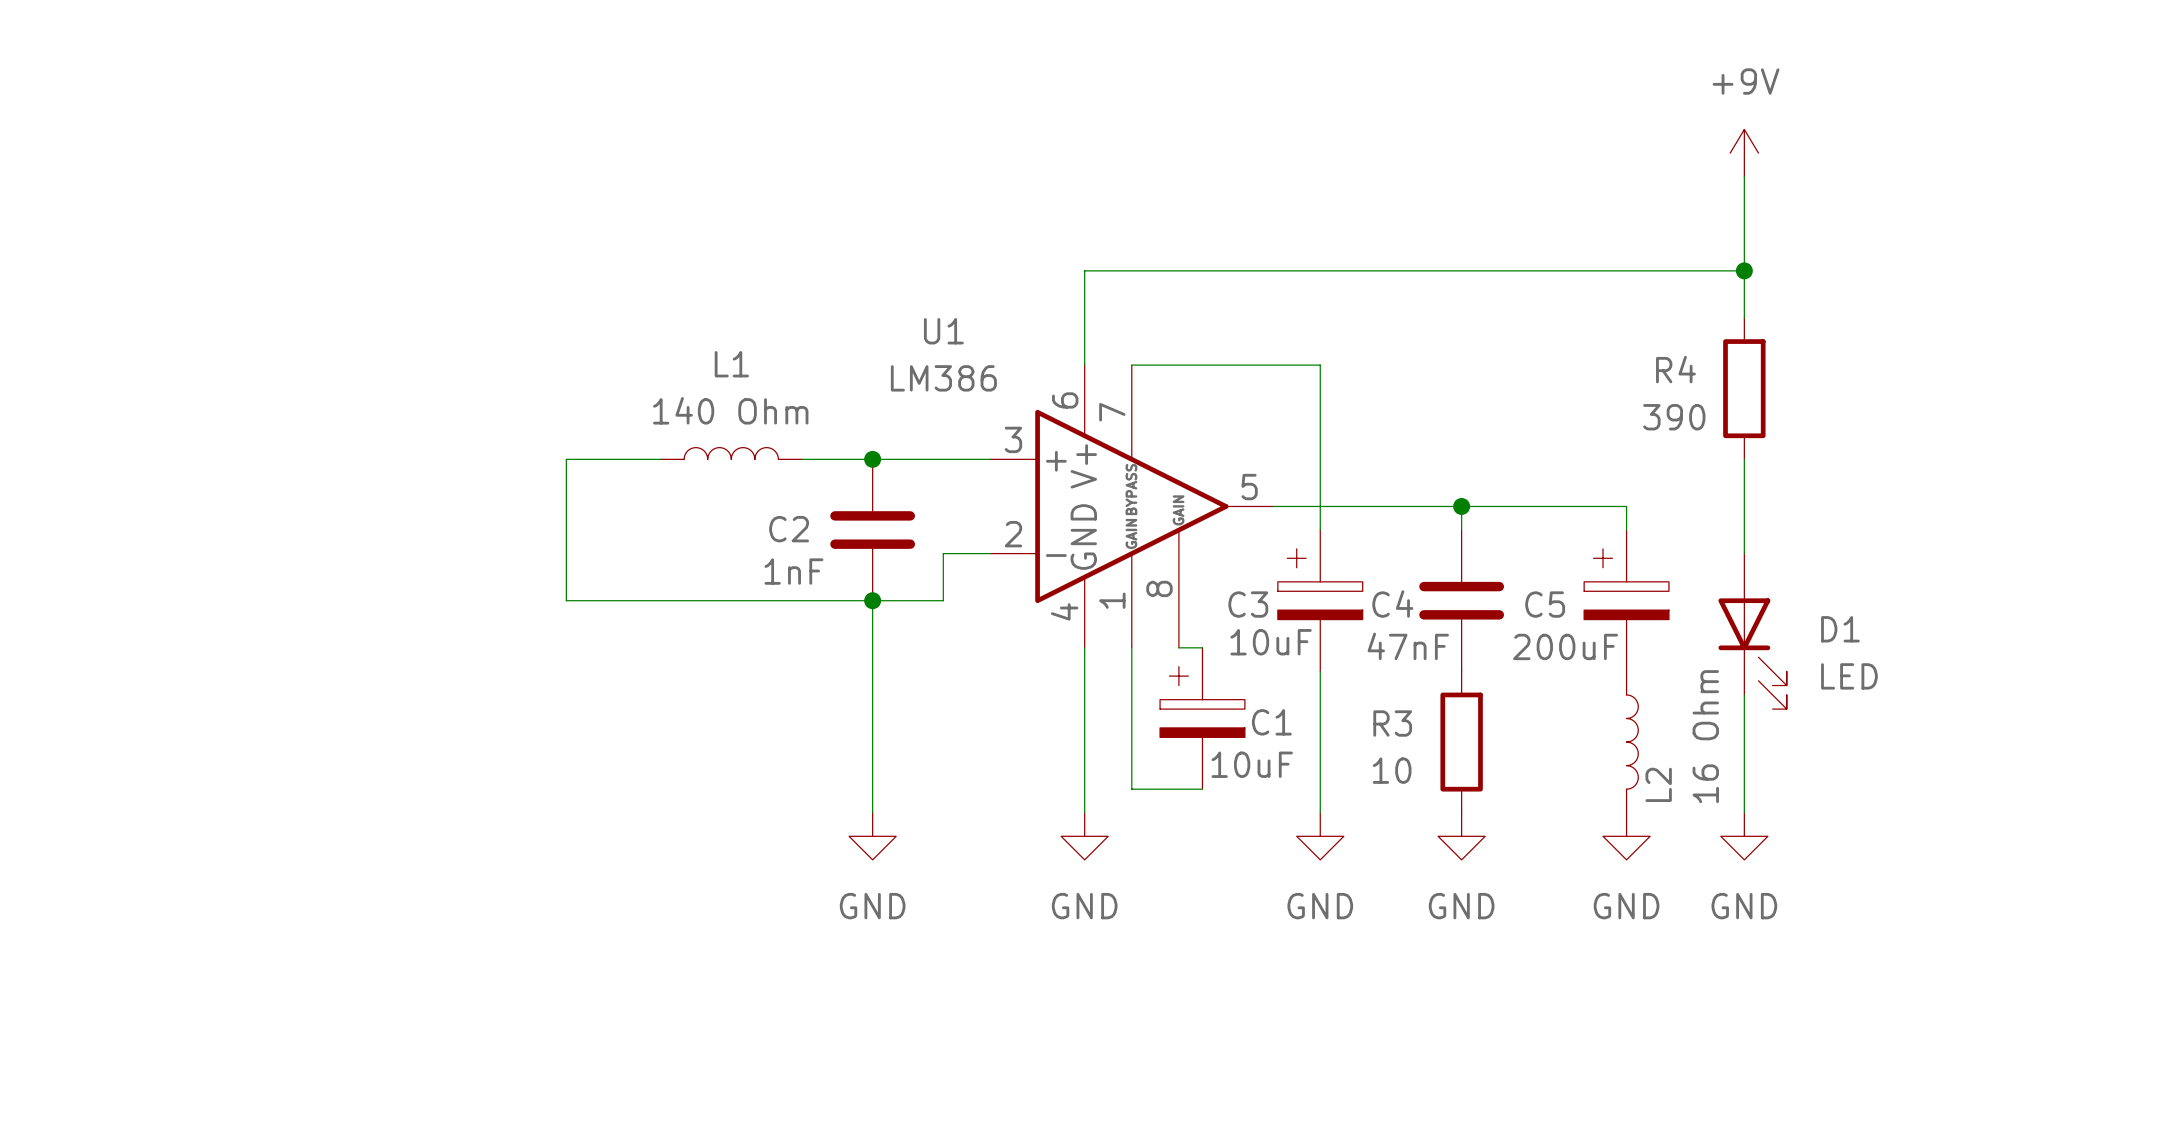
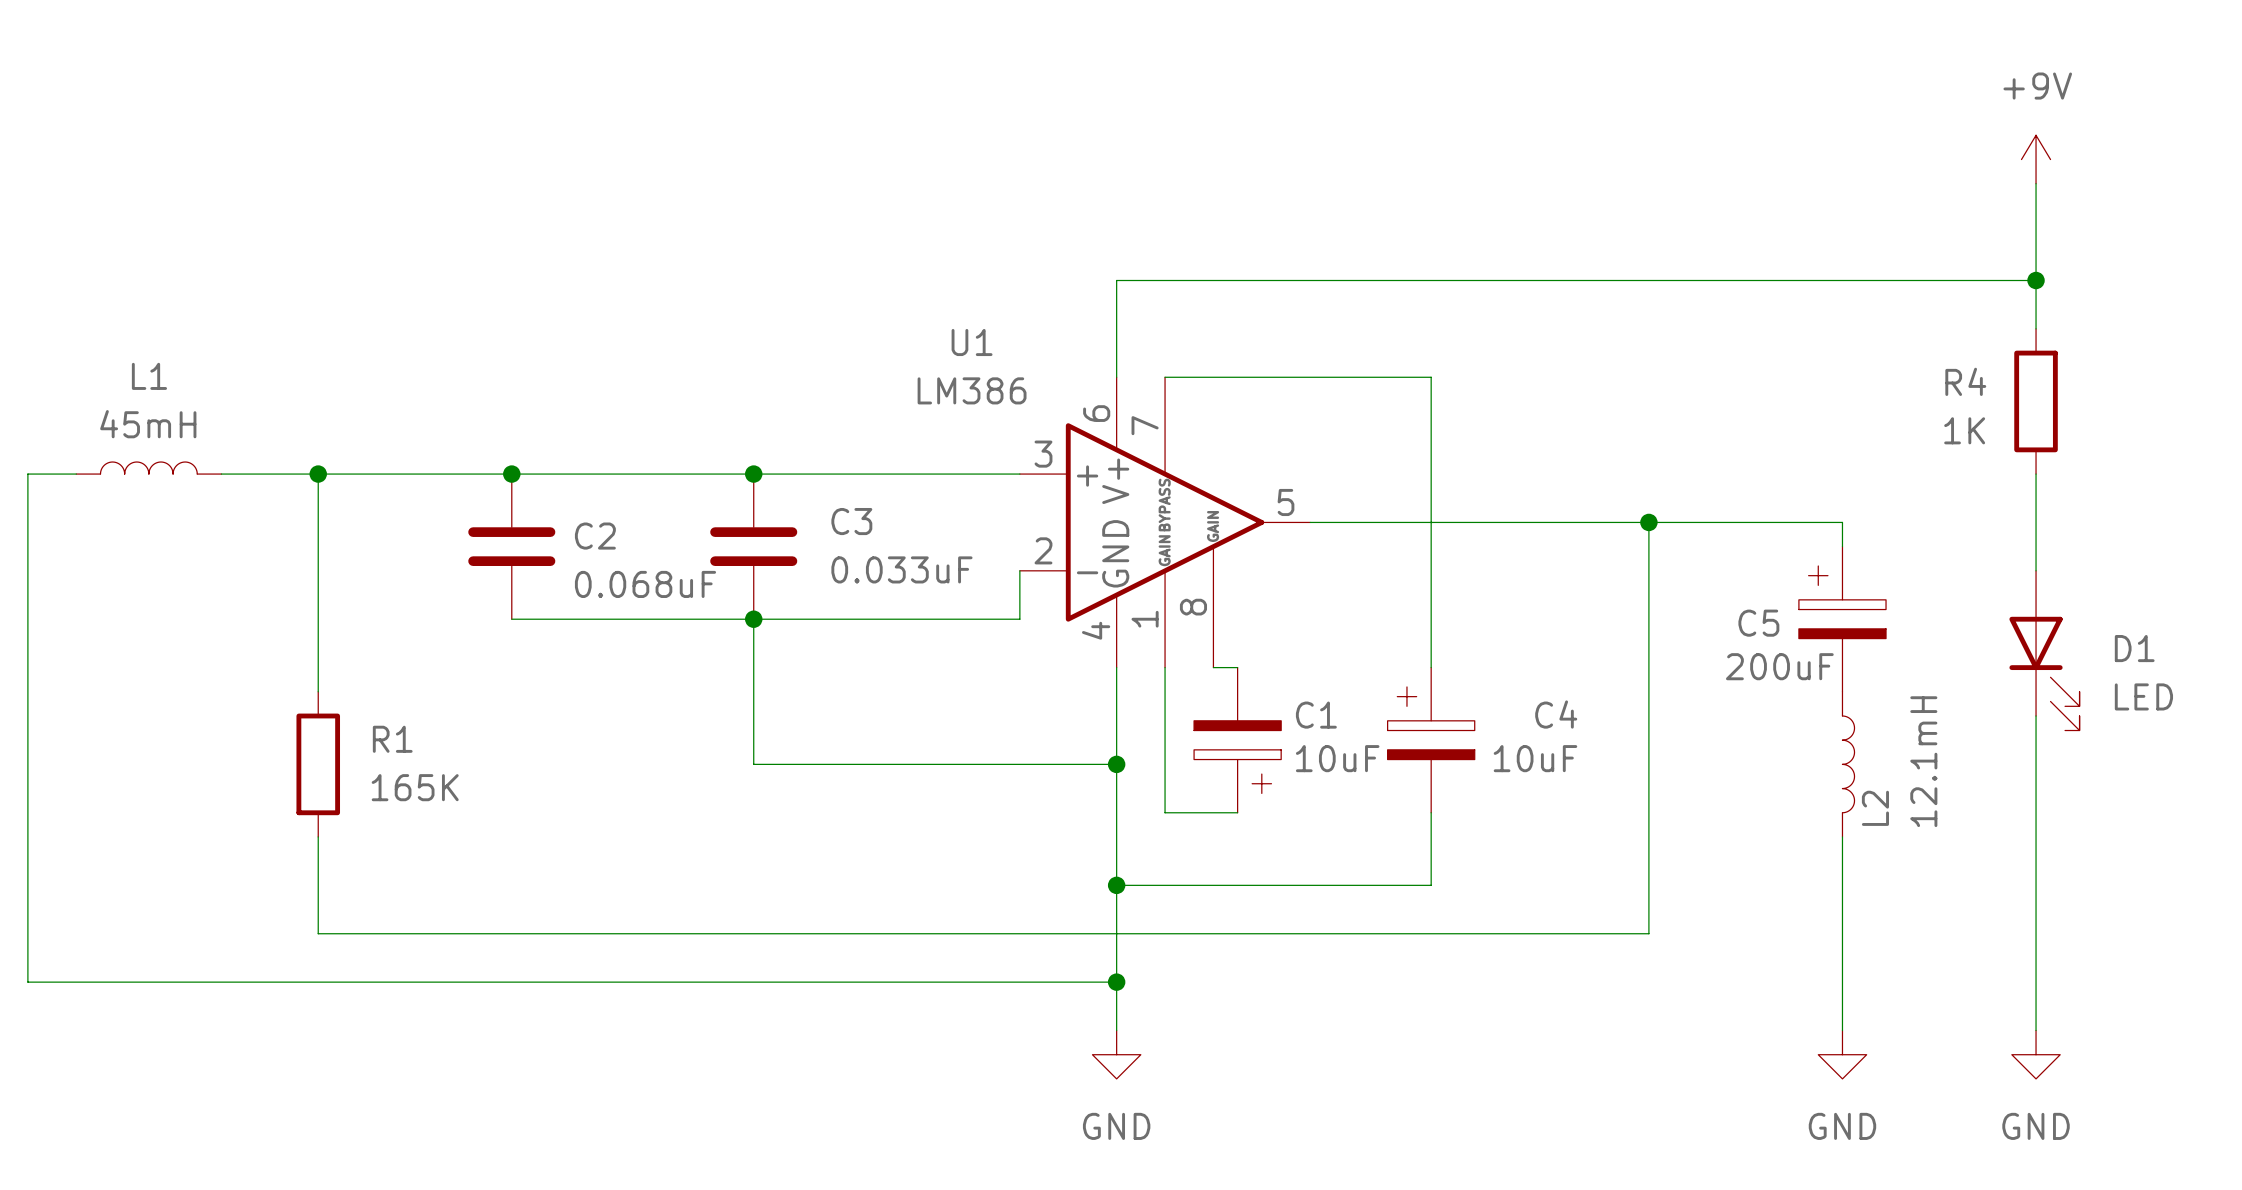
power symbol position: +9V (1744, 153) -> +9V (2036, 159)
wire: (1744, 176) (1744, 317) -> (2036, 183) (2036, 328)
wire: none -> (1794, 280) (2036, 280)
junction: (1744, 270) -> none
junction: none -> (2036, 280)
wire: (1320, 365) (1320, 530) -> (1358, 377) (1431, 377) (1431, 667)
R4 position: (1744, 388) -> (2036, 401)
L1 value: 140 Ohm (730, 410) -> 45mH (148, 424)
R4 value: 390 (1674, 417) -> 1K (1964, 430)
L1 position: (731, 453) -> (148, 468)
wire: none -> (76, 474) (27, 474) (27, 982) (1116, 982)
wire: none -> (221, 474) (584, 474)
wire: none -> (318, 474) (318, 691)
junction: none -> (318, 474)
junction: none -> (511, 474)
wire: (566, 459) (566, 600) -> (511, 619) (584, 619)
wire: none -> (681, 474) (826, 474)
junction: none -> (753, 474)
junction: (872, 459) -> none
wire: (1744, 459) (1744, 553) -> (2036, 474) (2036, 570)
wire: (1461, 506) (1461, 530) -> none
junction: (1461, 506) -> none
wire: none -> (1648, 522) (1648, 933) (318, 933) (318, 836)
junction: none -> (1648, 522)
wire: (1626, 506) (1626, 530) -> (1673, 522) (1842, 522) (1842, 546)
C2 name position: C2 (789, 529) -> C2 (595, 536)
C2 position: (872, 530) -> (511, 546)
C3 symbol: [1277, 530, 1363, 672] -> [710, 474, 798, 620]
C4 symbol: [1419, 530, 1505, 672] -> [1387, 667, 1475, 813]
wire: (990, 553) (943, 553) (943, 600) -> (1019, 570) (1019, 619) (971, 619)
C2 value: 1nF (793, 571) -> 0.068uF (645, 584)
wire: none -> (753, 619) (753, 764) (1116, 764)
junction: none -> (753, 619)
wire: (872, 600) (872, 812) -> none
junction: (872, 600) -> none
C5 position: (1626, 600) -> (1842, 619)
C4 name position: C4 (1392, 603) -> C4 (1556, 714)
C3 name position: C3 (1248, 604) -> C3 (851, 521)
D1 position: (1752, 631) -> (2044, 650)
C3 value: 10uF (1271, 642) -> 0.033uF (901, 569)
C4 value: 47nF (1408, 646) -> 10uF (1535, 758)
wire: (1320, 671) (1320, 812) -> none
wire: (1744, 694) (1744, 812) -> none
wire: none -> (2036, 715) (2036, 1030)
C1 rotation: 0° (1202, 702) -> 180° (1237, 757)
L2 value: 16 Ohm (1705, 736) -> 12.1mH (1923, 761)
R1: none -> 165K (318, 764)
junction: none -> (1116, 764)
R3: 10 (1461, 742) -> none
L2 position: (1632, 742) -> (1848, 764)
C1 value position: 10uF (1252, 764) -> 10uF (1337, 758)
wire: none -> (1431, 812) (1431, 885) (1116, 885)
wire: none -> (1116, 836) (1116, 1030)
wire: none -> (1842, 836) (1842, 1030)
power symbol: GND (872, 836) -> none
power symbol: GND (1084, 836) -> none
power symbol: GND (1320, 836) -> none
power symbol: GND (1461, 836) -> none
power symbol: GND (1626, 836) -> none
power symbol: GND (1744, 836) -> none
junction: none -> (1116, 885)
junction: none -> (1116, 982)
power symbol: none -> GND (1116, 1054)
power symbol: none -> GND (1842, 1054)
power symbol: none -> GND (2036, 1054)

